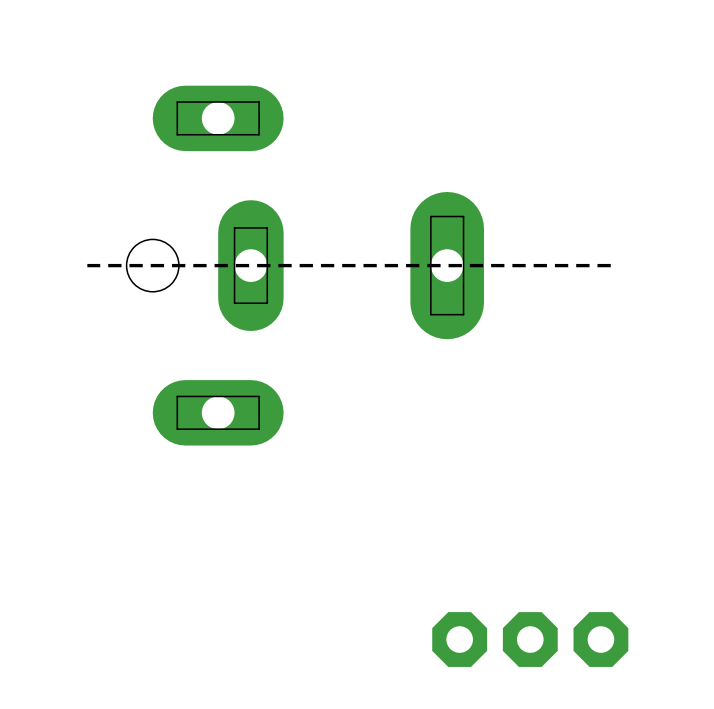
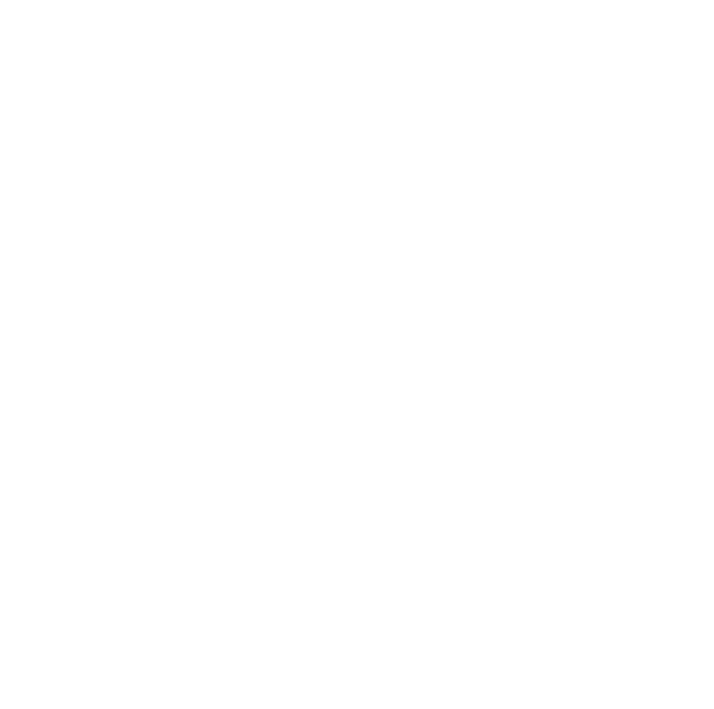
part: (349, 265) -> none
part: (530, 639) -> none

